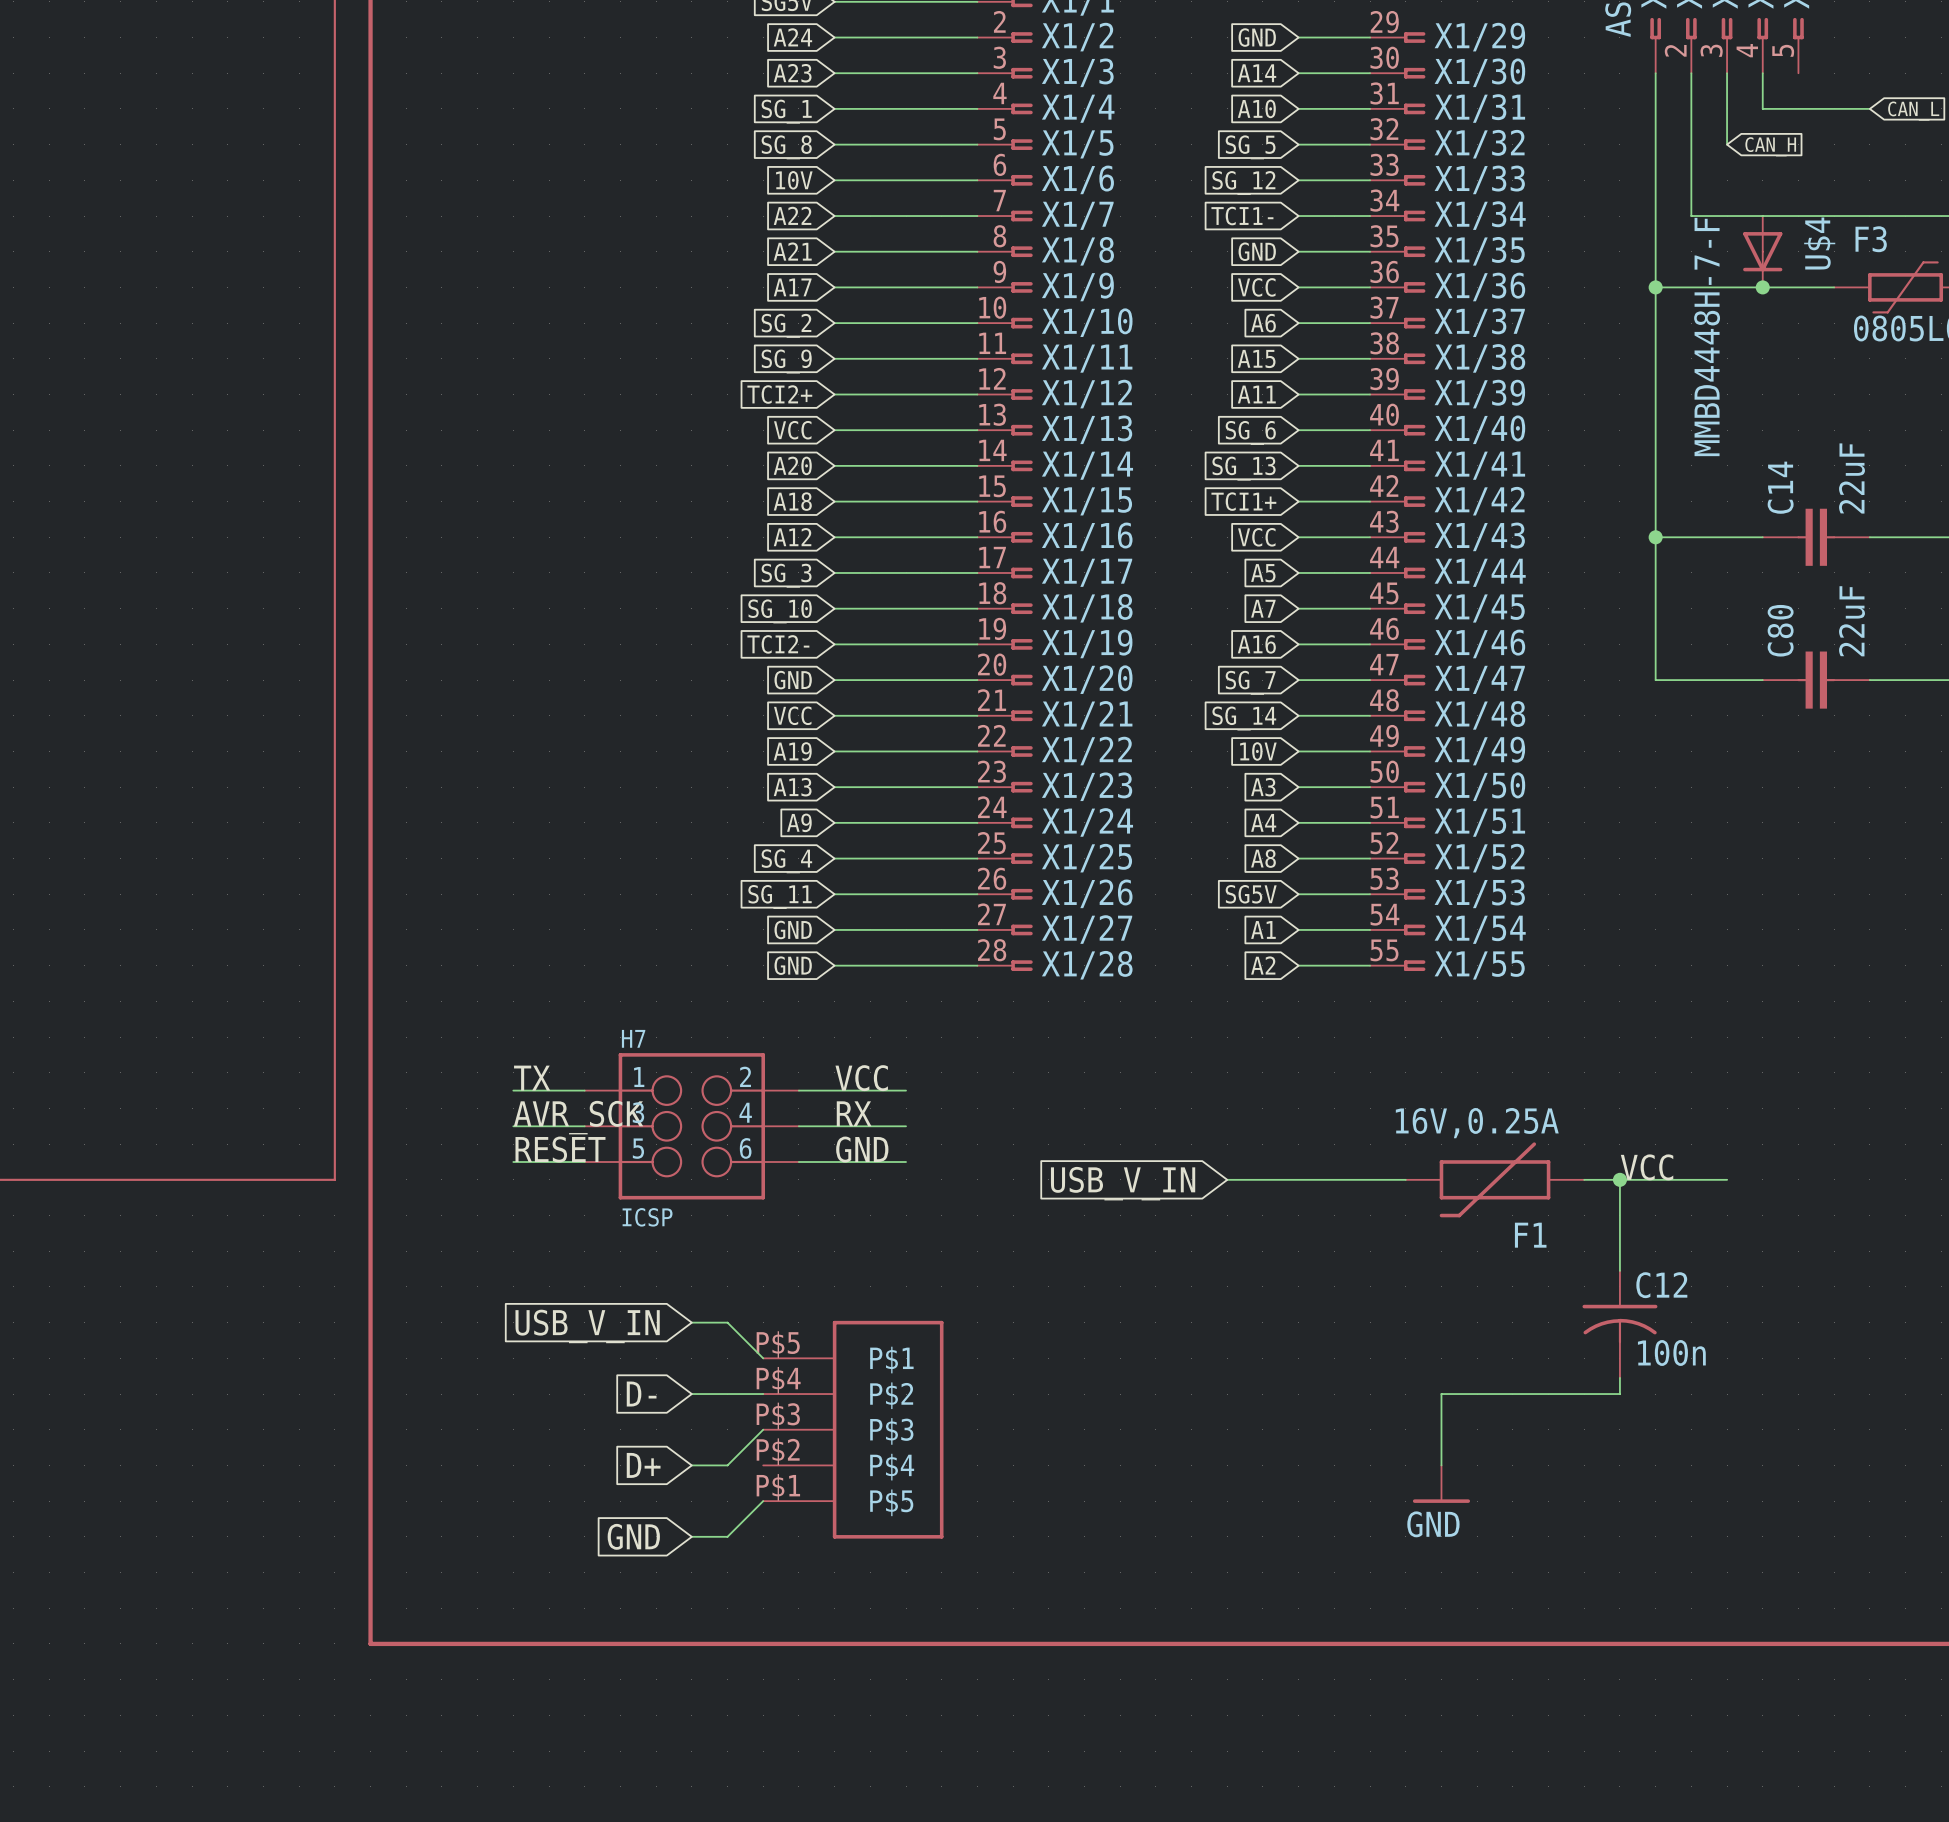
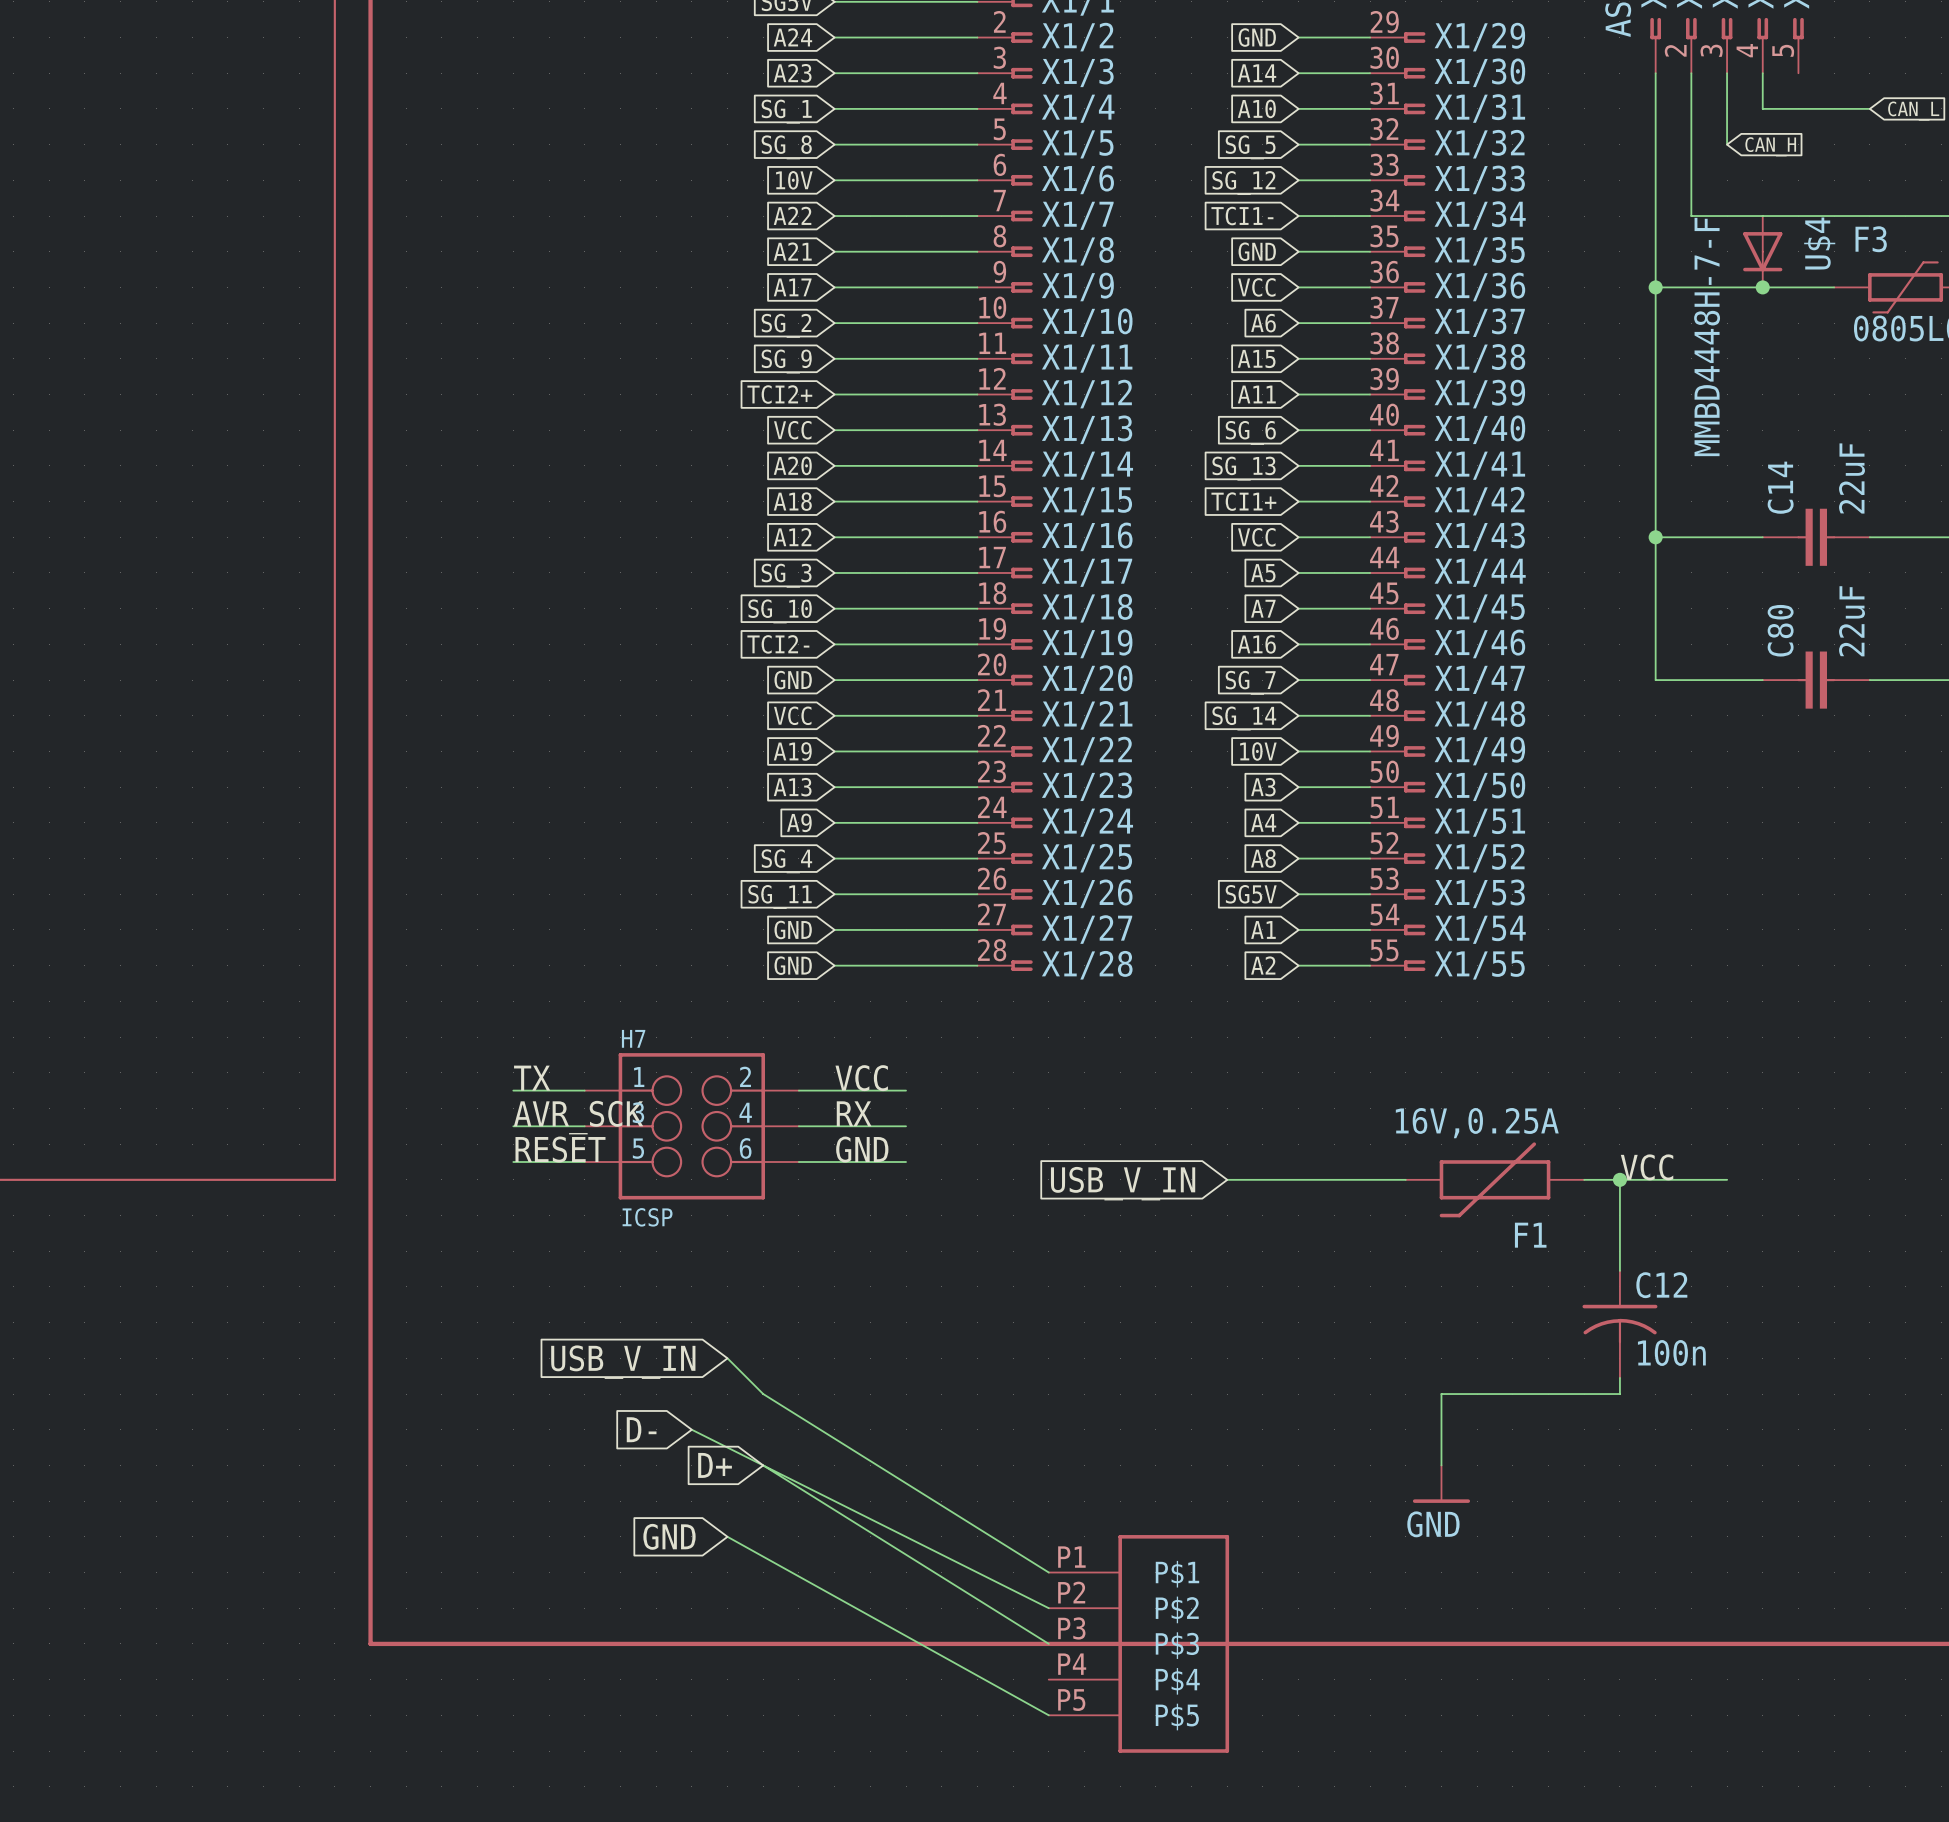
wire: (691, 1322) (727, 1322) (763, 1358) -> none
global label position: USB_V_IN (587, 1326) -> USB_V_IN (623, 1362)
wire: none -> (727, 1358) (763, 1394) (1048, 1572)
global label position: D- (641, 1394) -> D- (641, 1429)
wire: (691, 1394) (763, 1394) -> none
wire: none -> (691, 1429) (1048, 1608)
wire: (763, 1429) (727, 1465) (691, 1465) -> none
part: (853, 1429) -> none
global label position: D+ (643, 1465) -> D+ (715, 1465)
wire: none -> (763, 1465) (1048, 1643)
wire: (763, 1501) (727, 1536) (691, 1536) -> none
global label position: GND (633, 1536) -> GND (669, 1536)
wire: none -> (727, 1536) (1048, 1715)
part: none -> (1138, 1643)

